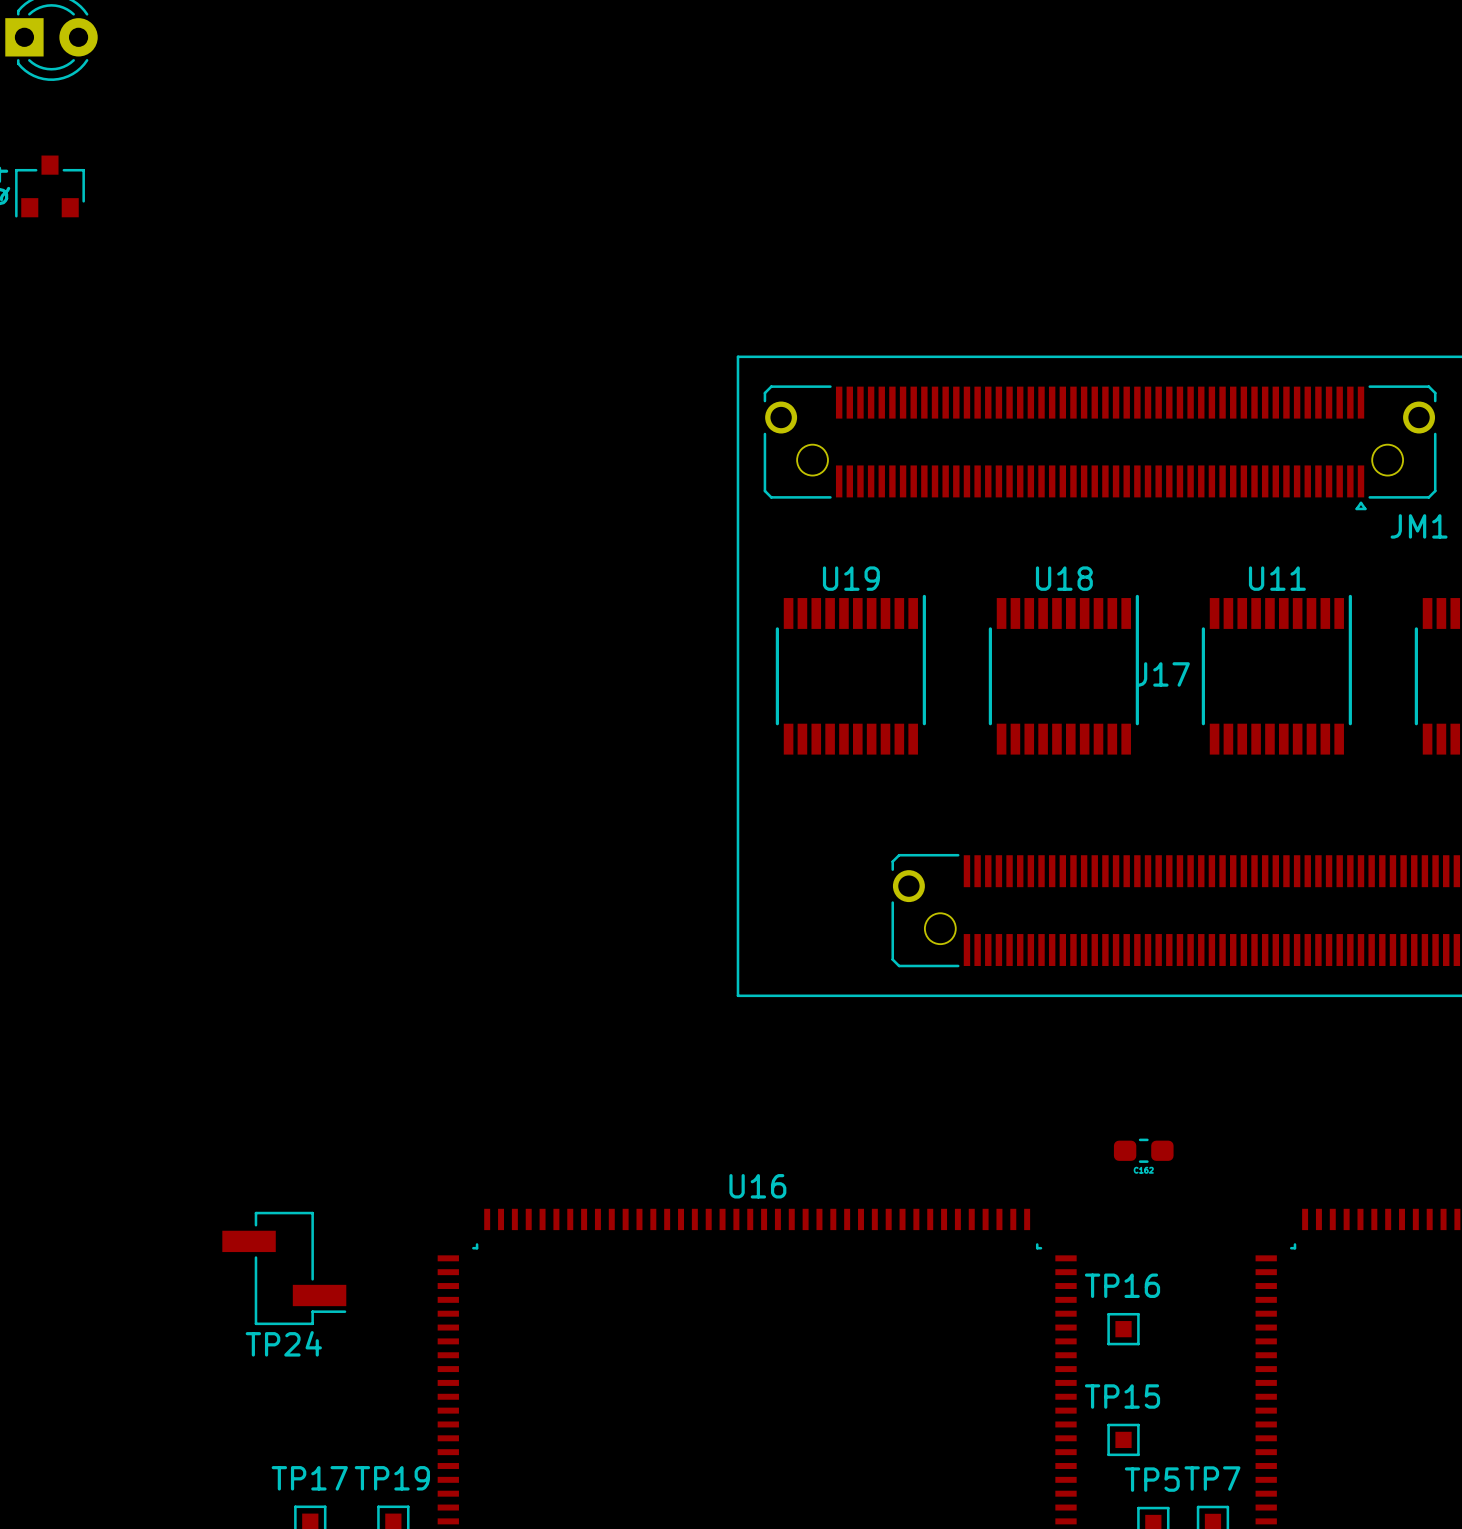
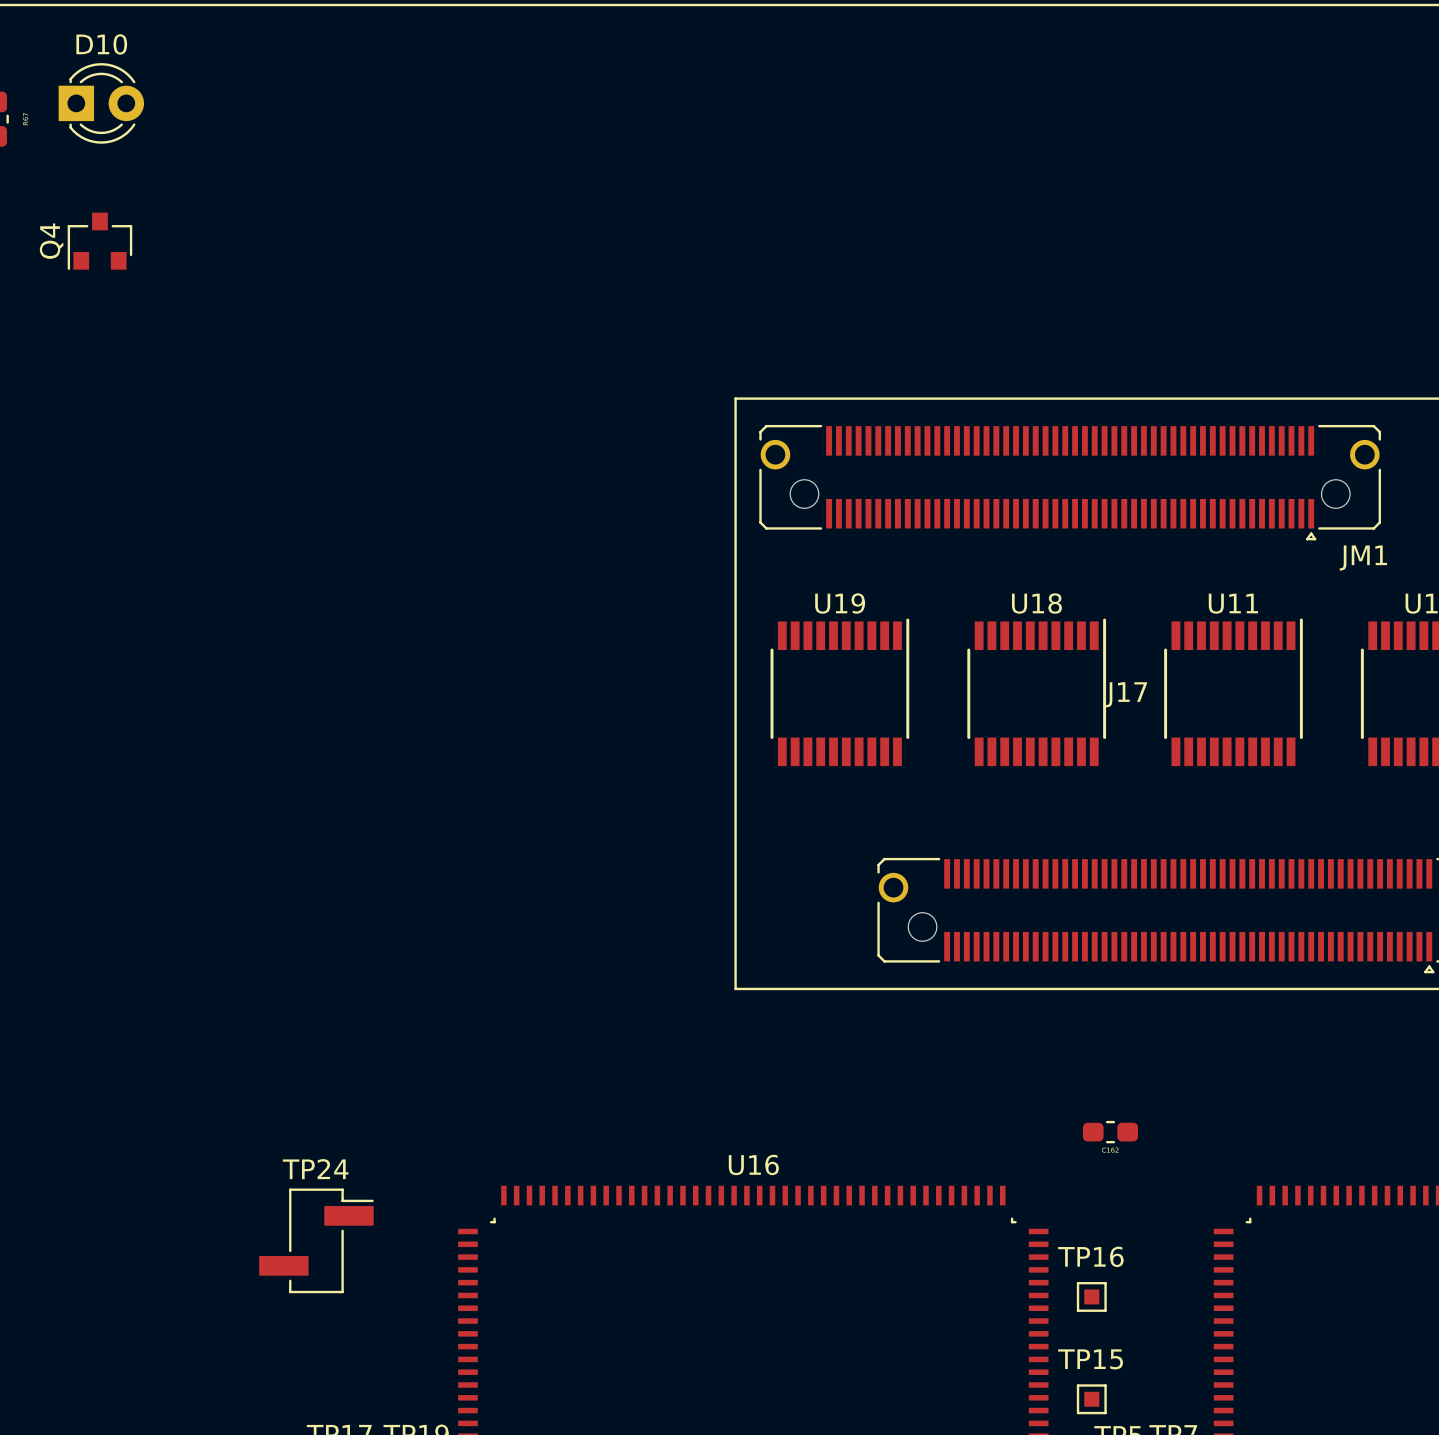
TP24 footprint: [222, 1211, 347, 1326] -> [259, 1188, 374, 1294]
TP24 name position: TP24 (283, 1343) -> TP24 (315, 1169)

